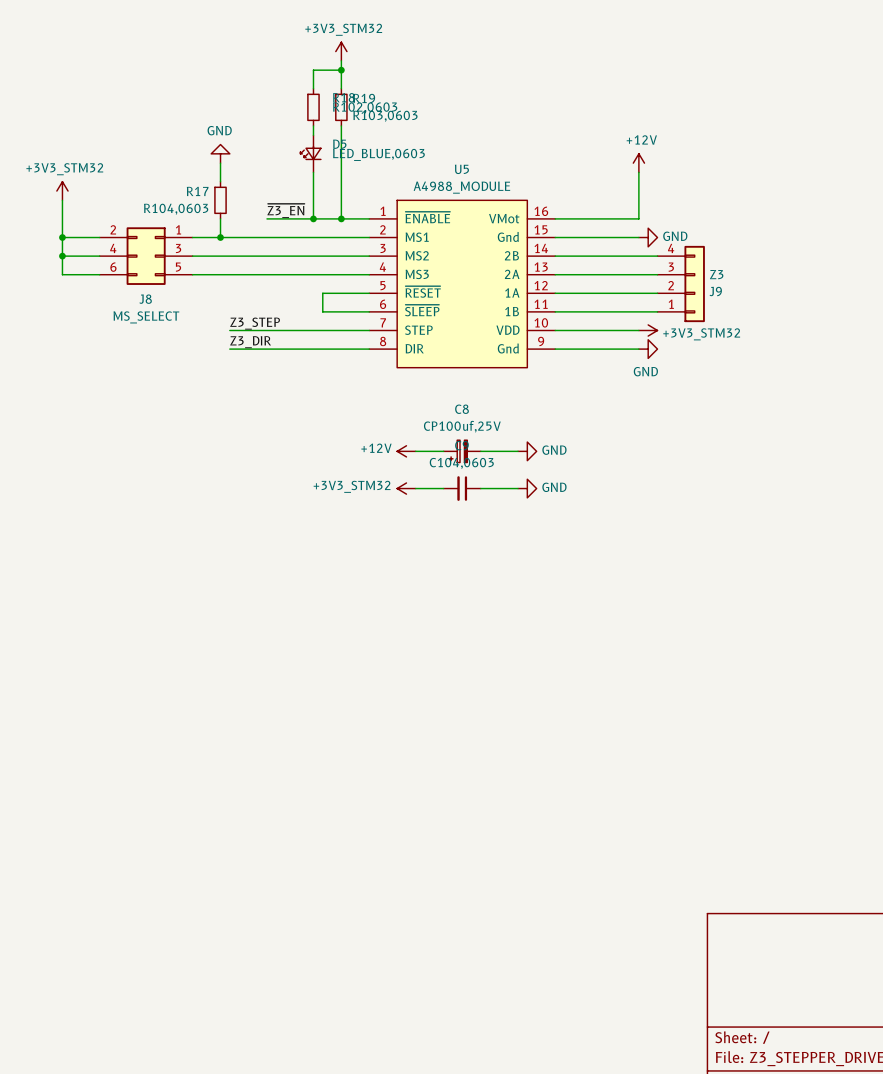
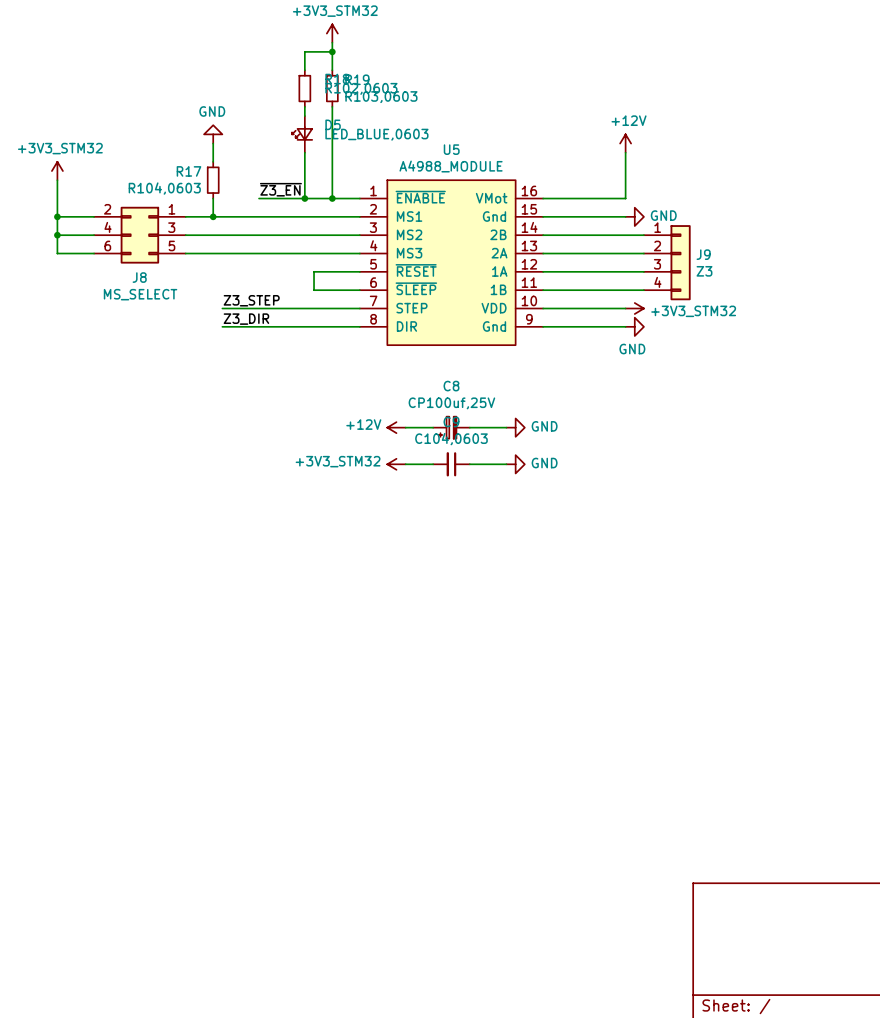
J9 flip: as is (694, 284) -> up-down (680, 262)

